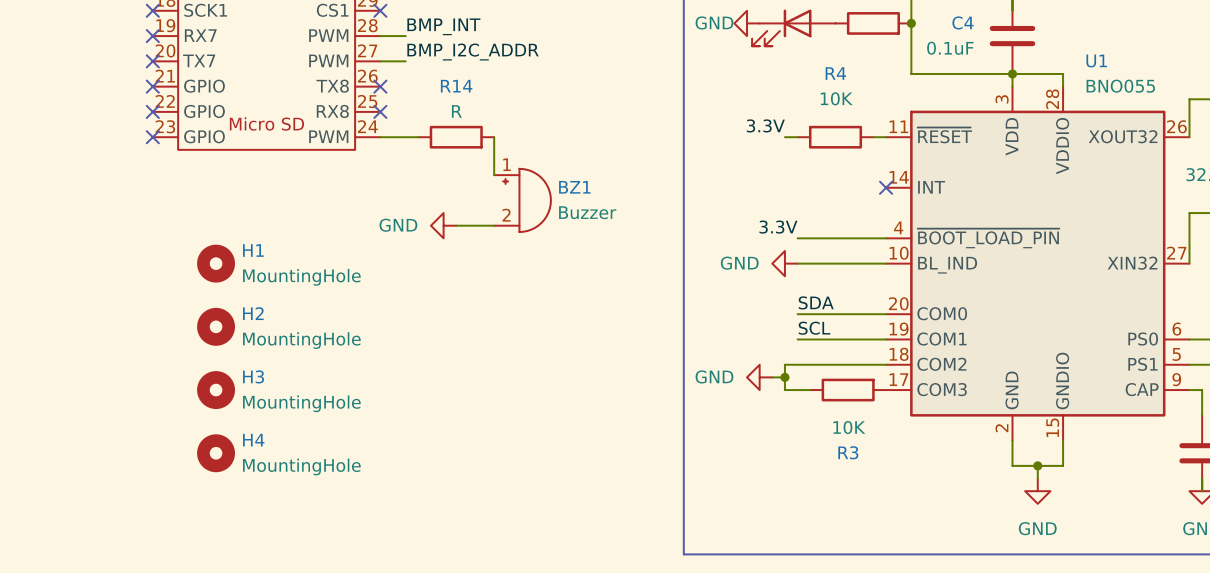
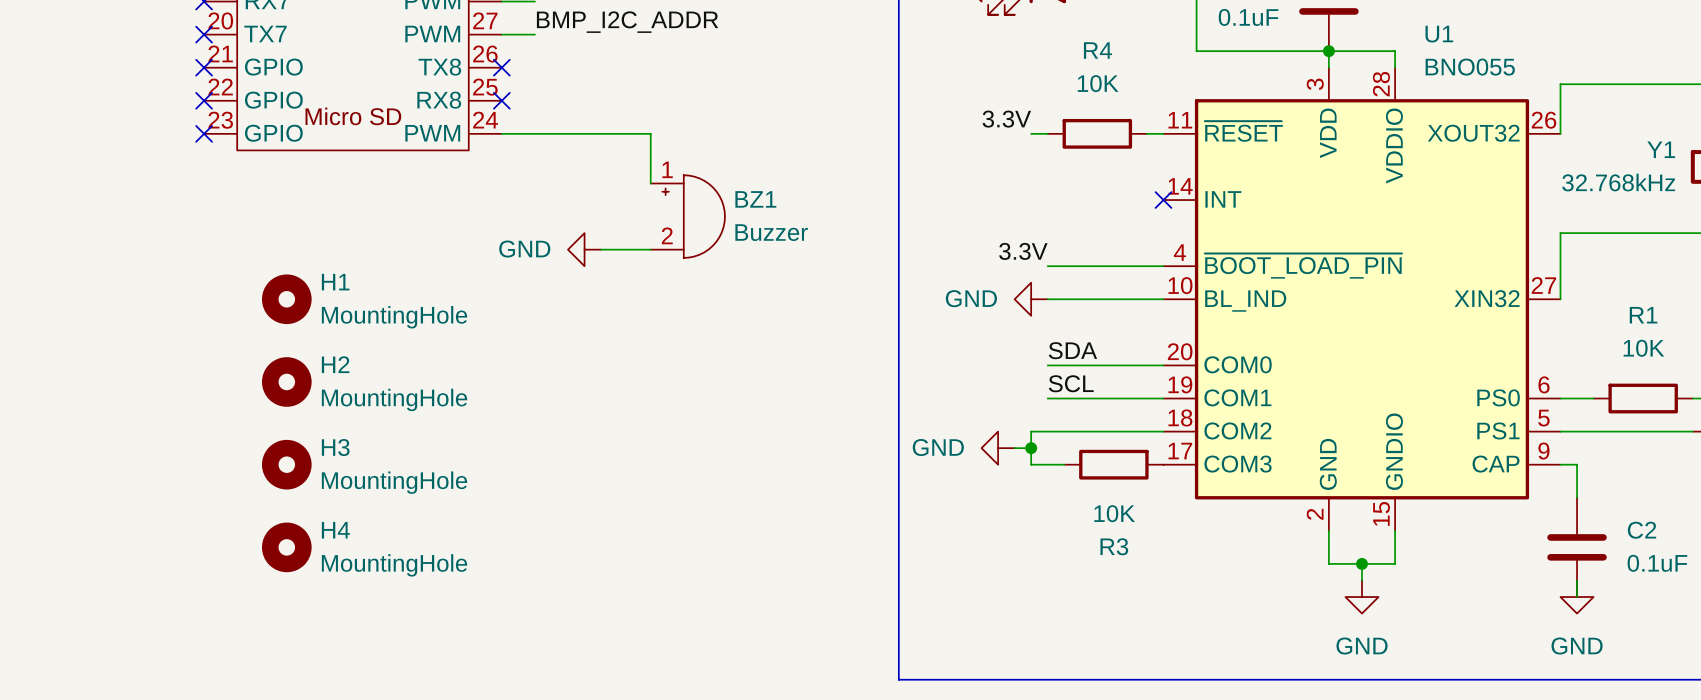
wire: none -> (551, 133) (650, 133)
R14: R (456, 137) -> none

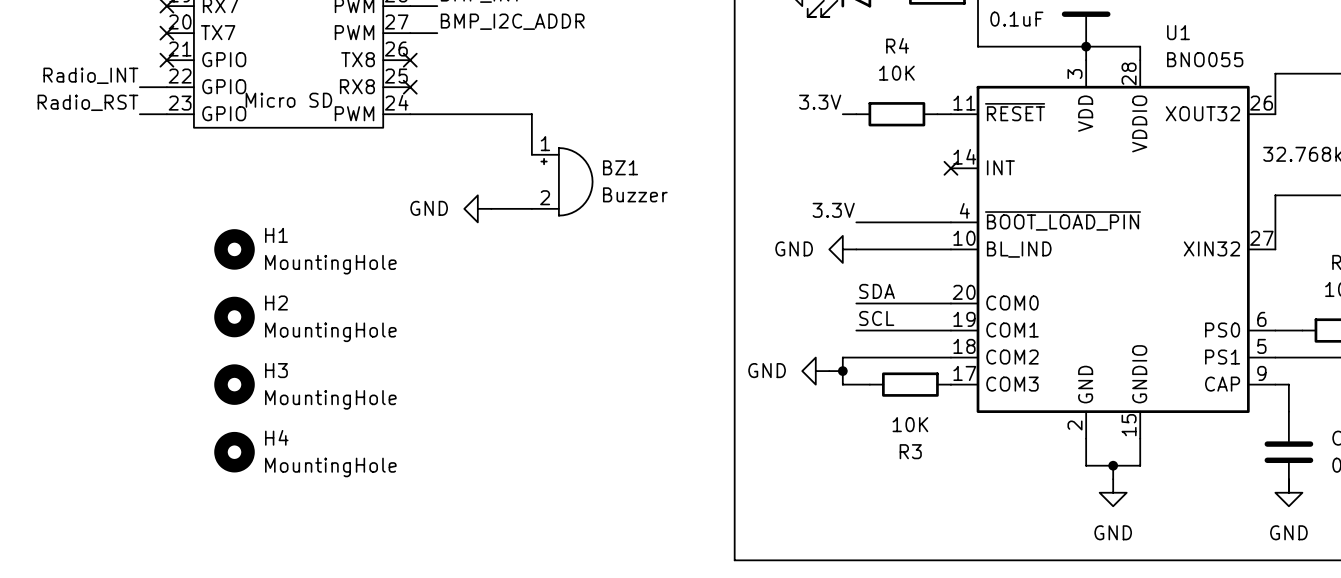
label: none -> Radio_INT (90, 75)
wire: none -> (139, 87) (166, 87)
no-connect mark: (204, 100) -> none
label: none -> Radio_RST (87, 102)
wire: none -> (139, 114) (166, 114)
no-connect mark: (204, 133) -> none

